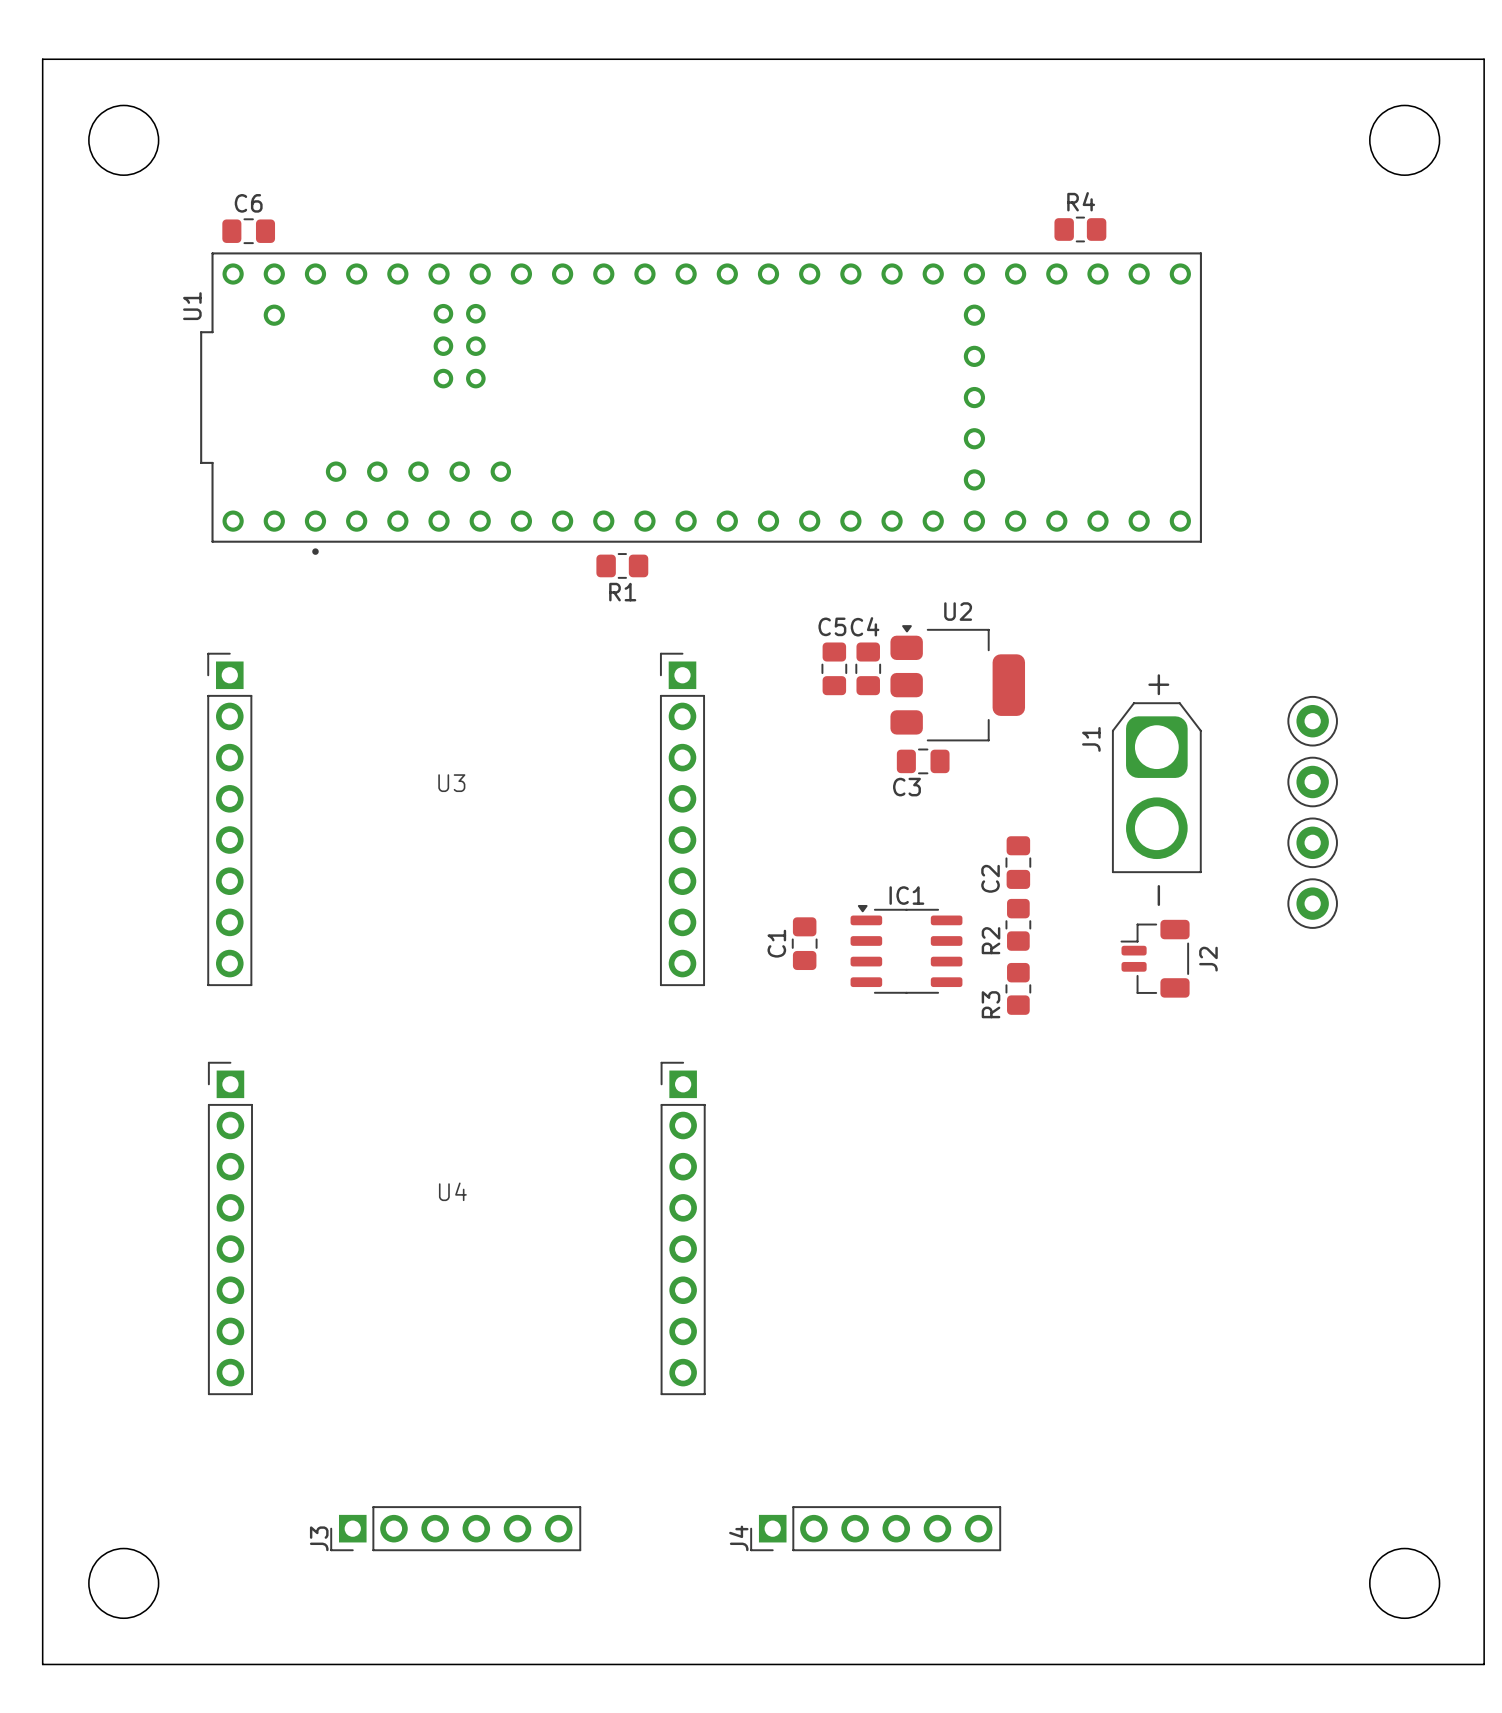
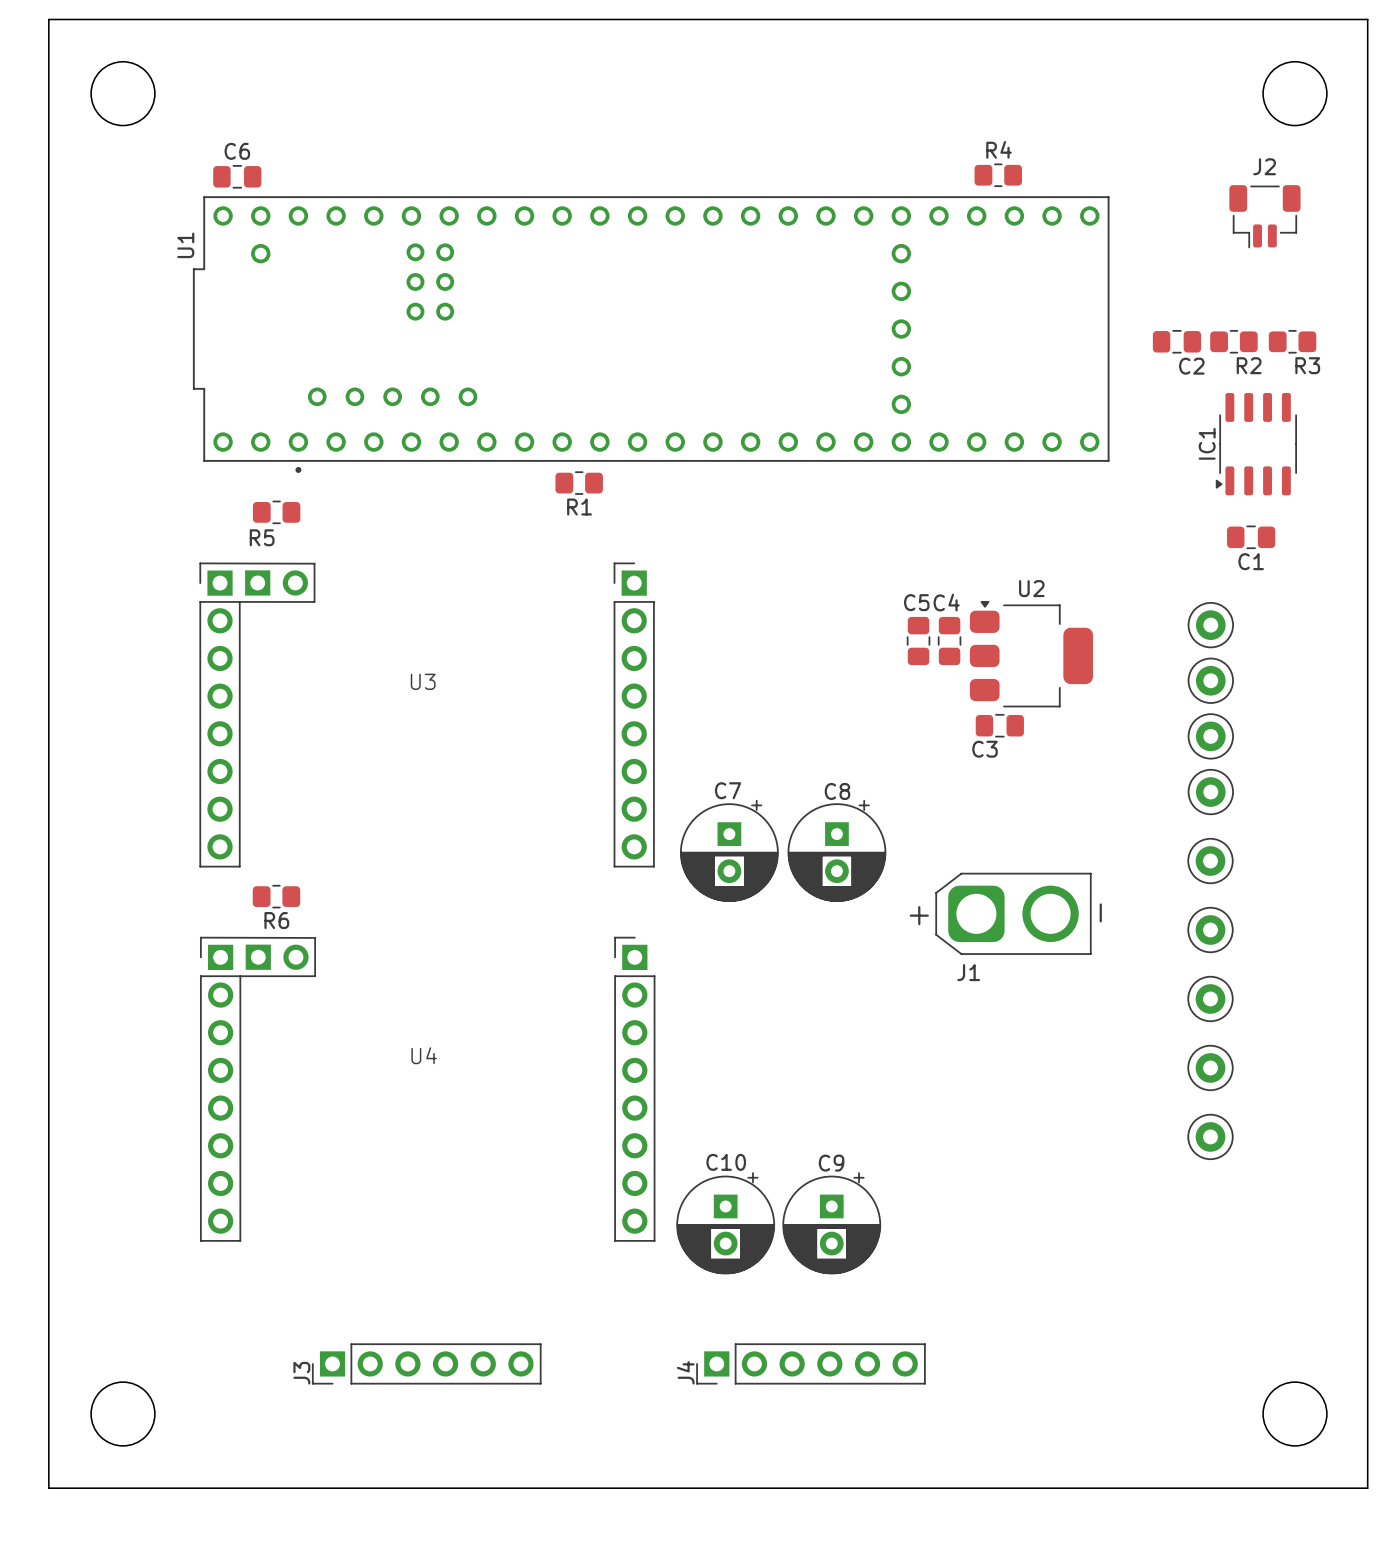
R5: none -> (276, 512)
U3 footprint: [207, 652, 706, 987] -> [199, 562, 655, 868]
C5 position: (834, 668) -> (918, 641)
C4 position: (868, 668) -> (949, 641)
U2 position: (957, 683) -> (1031, 654)
J1 footprint: [1111, 702, 1202, 874] -> [935, 872, 1092, 955]
J1 name position: J1 (1091, 739) -> J1 (968, 972)
C3 position: (923, 761) -> (999, 725)
C2 rotation: 0° (1018, 862) -> 90° clockwise (1176, 341)
C2 position: (1018, 862) -> (1176, 341)
C2 name position: C2 (990, 878) -> C2 (1191, 366)
R2 rotation: 0° (1018, 924) -> 90° clockwise (1233, 341)
R2 position: (1018, 924) -> (1233, 341)
R2 name position: R2 (991, 940) -> R2 (1249, 365)
C1 name position: C1 (776, 943) -> C1 (1251, 561)
C1 rotation: 0° (804, 943) -> 90° clockwise (1251, 537)
C1 position: (804, 943) -> (1251, 537)
IC1 rotation: 0° (906, 949) -> 90° counterclockwise (1256, 444)
IC1 position: (906, 949) -> (1256, 444)
J2 rotation: 0° (1155, 958) -> 90° counterclockwise (1264, 216)
J2 position: (1155, 958) -> (1264, 216)
C7: none -> (729, 850)
C8: none -> (836, 850)
part: none -> (1210, 861)
R3 rotation: 0° (1018, 988) -> 90° clockwise (1292, 341)
R3 position: (1018, 988) -> (1292, 341)
R3 name position: R3 (991, 1004) -> R3 (1307, 365)
R6: none -> (276, 896)
part: none -> (1210, 930)
U4 footprint: [207, 1061, 706, 1396] -> [199, 936, 656, 1242]
part: none -> (1210, 998)
part: none -> (1210, 1067)
part: none -> (1210, 1136)
C10: none -> (725, 1223)
C9: none -> (831, 1223)

